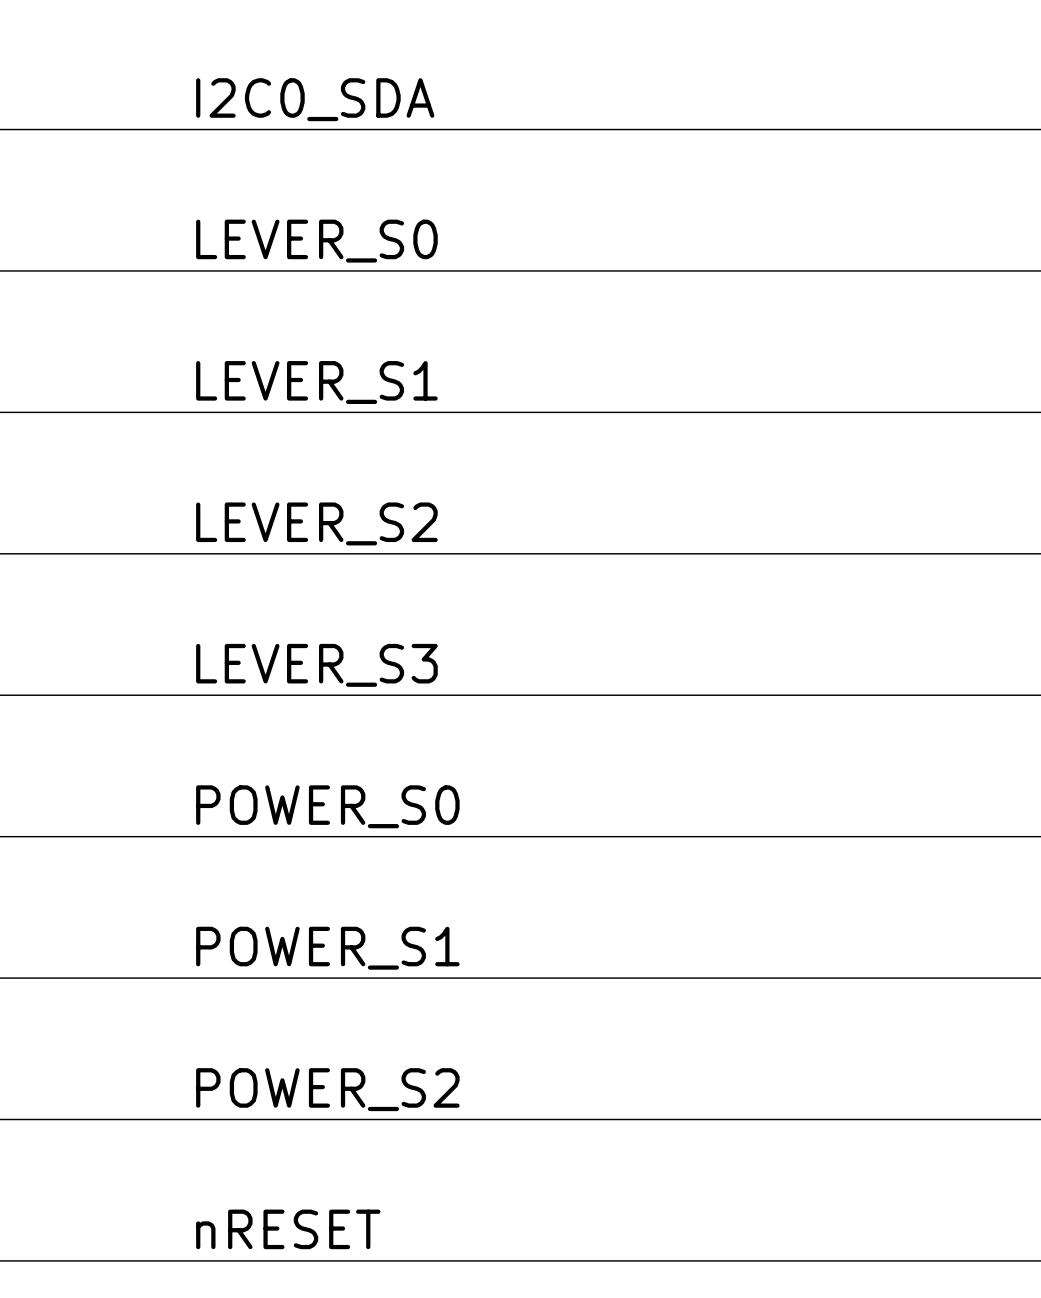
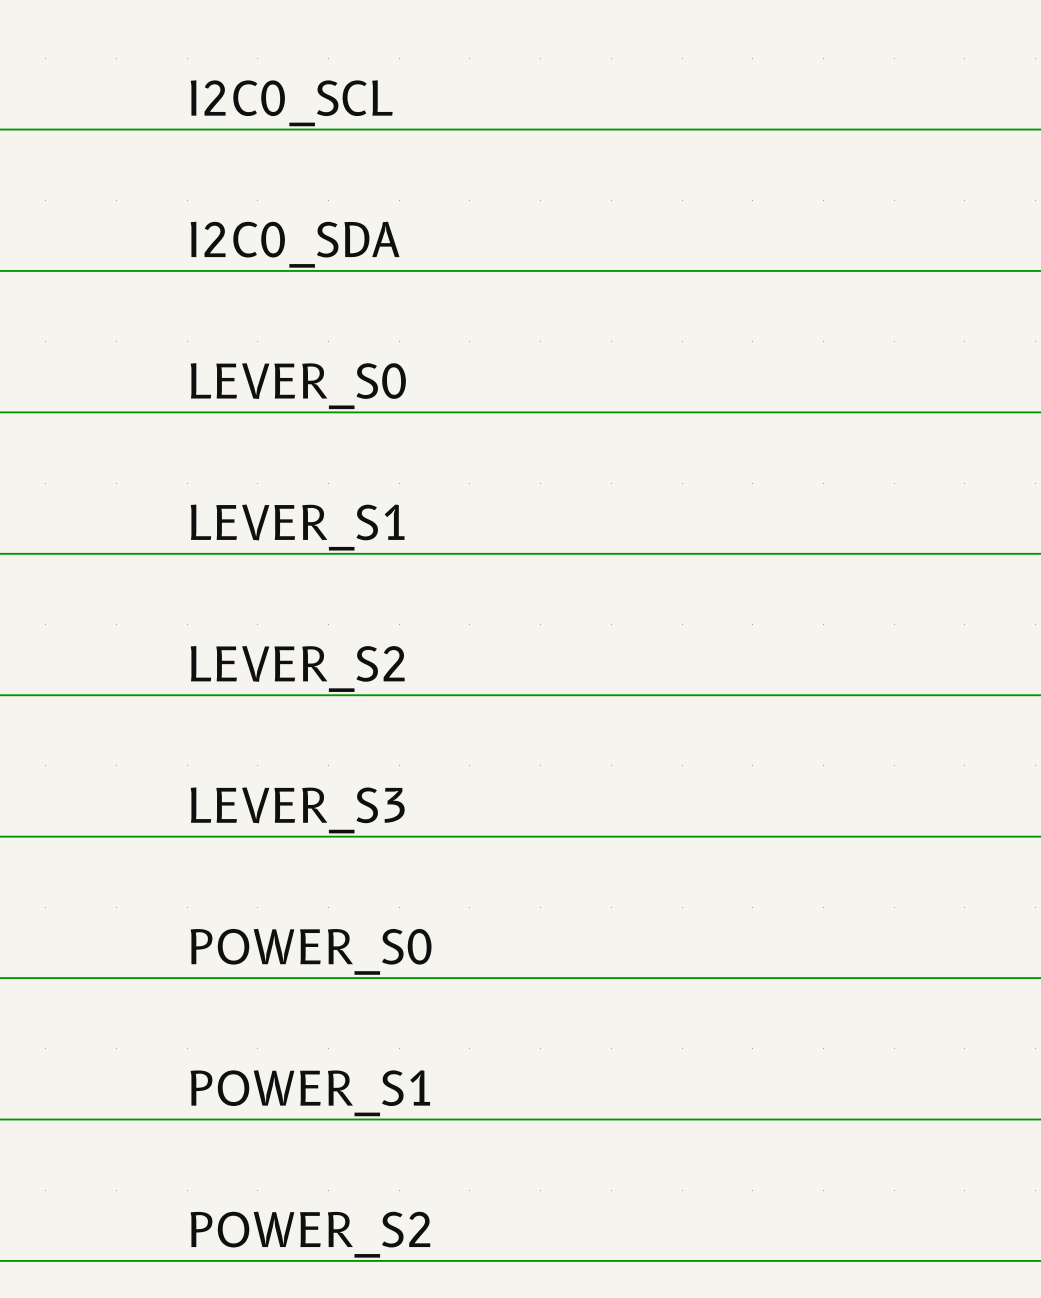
label: I2C0_SDA (315, 99) -> I2C0_SCL (291, 103)
label: LEVER_S0 (316, 241) -> I2C0_SDA (295, 244)
label: LEVER_S1 (316, 382) -> LEVER_S0 (298, 386)
label: LEVER_S2 (316, 523) -> LEVER_S1 (297, 527)
label: LEVER_S3 (316, 665) -> LEVER_S2 (297, 668)
label: POWER_S0 (327, 806) -> LEVER_S3 (297, 810)
label: POWER_S1 (327, 948) -> POWER_S0 (311, 951)
label: POWER_S2 (327, 1089) -> POWER_S1 (310, 1093)
label: nRESET (288, 1229) -> POWER_S2 (310, 1234)

